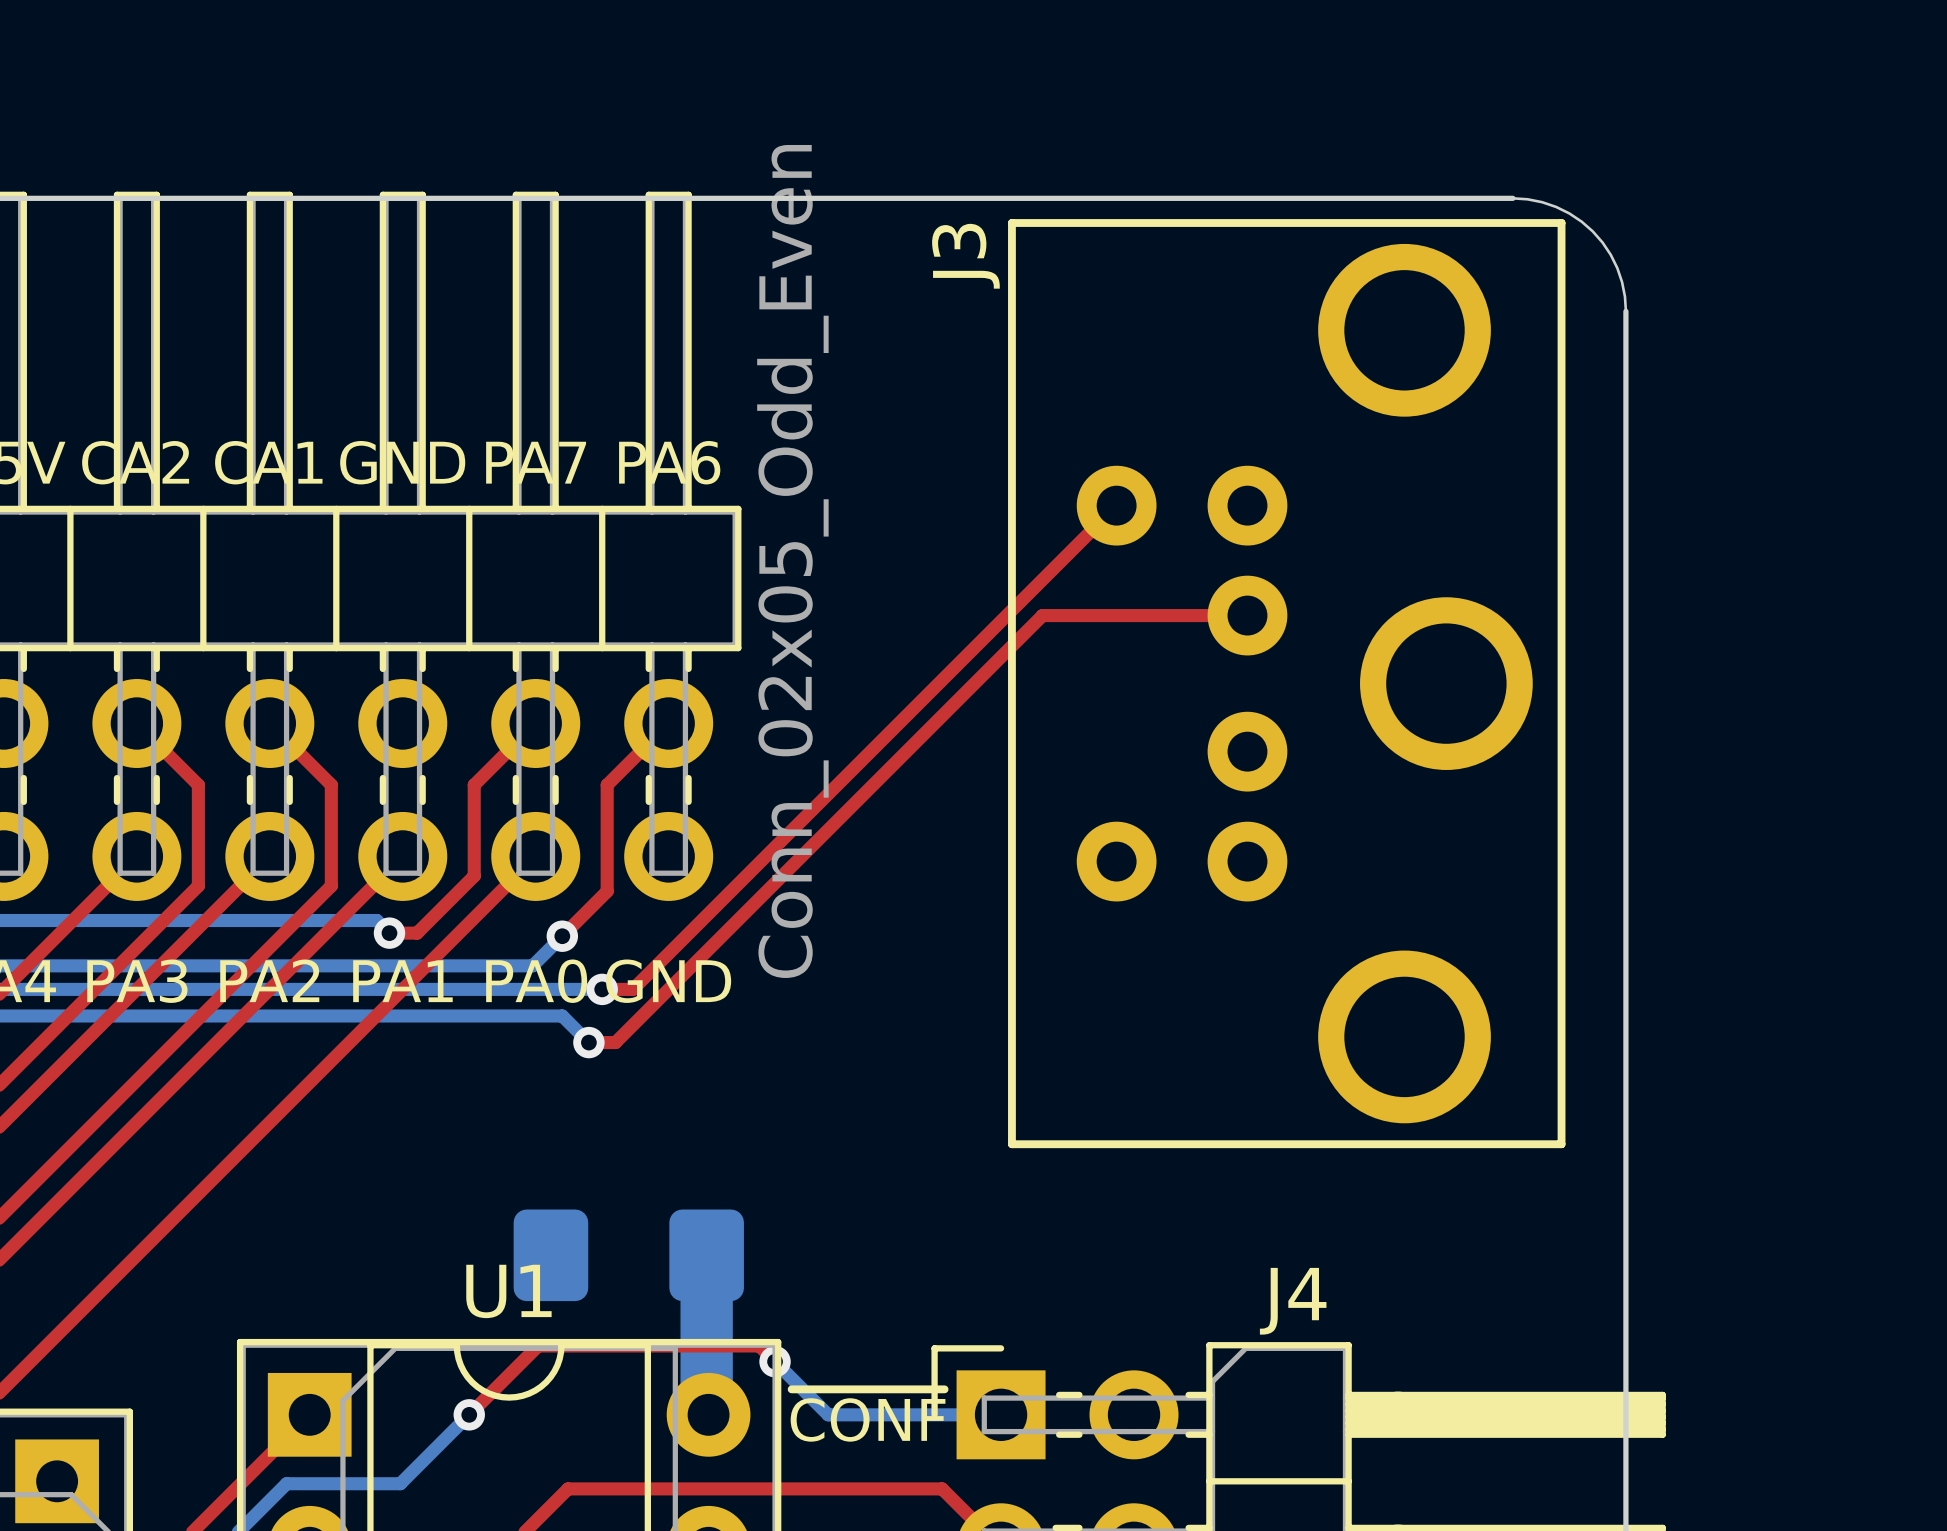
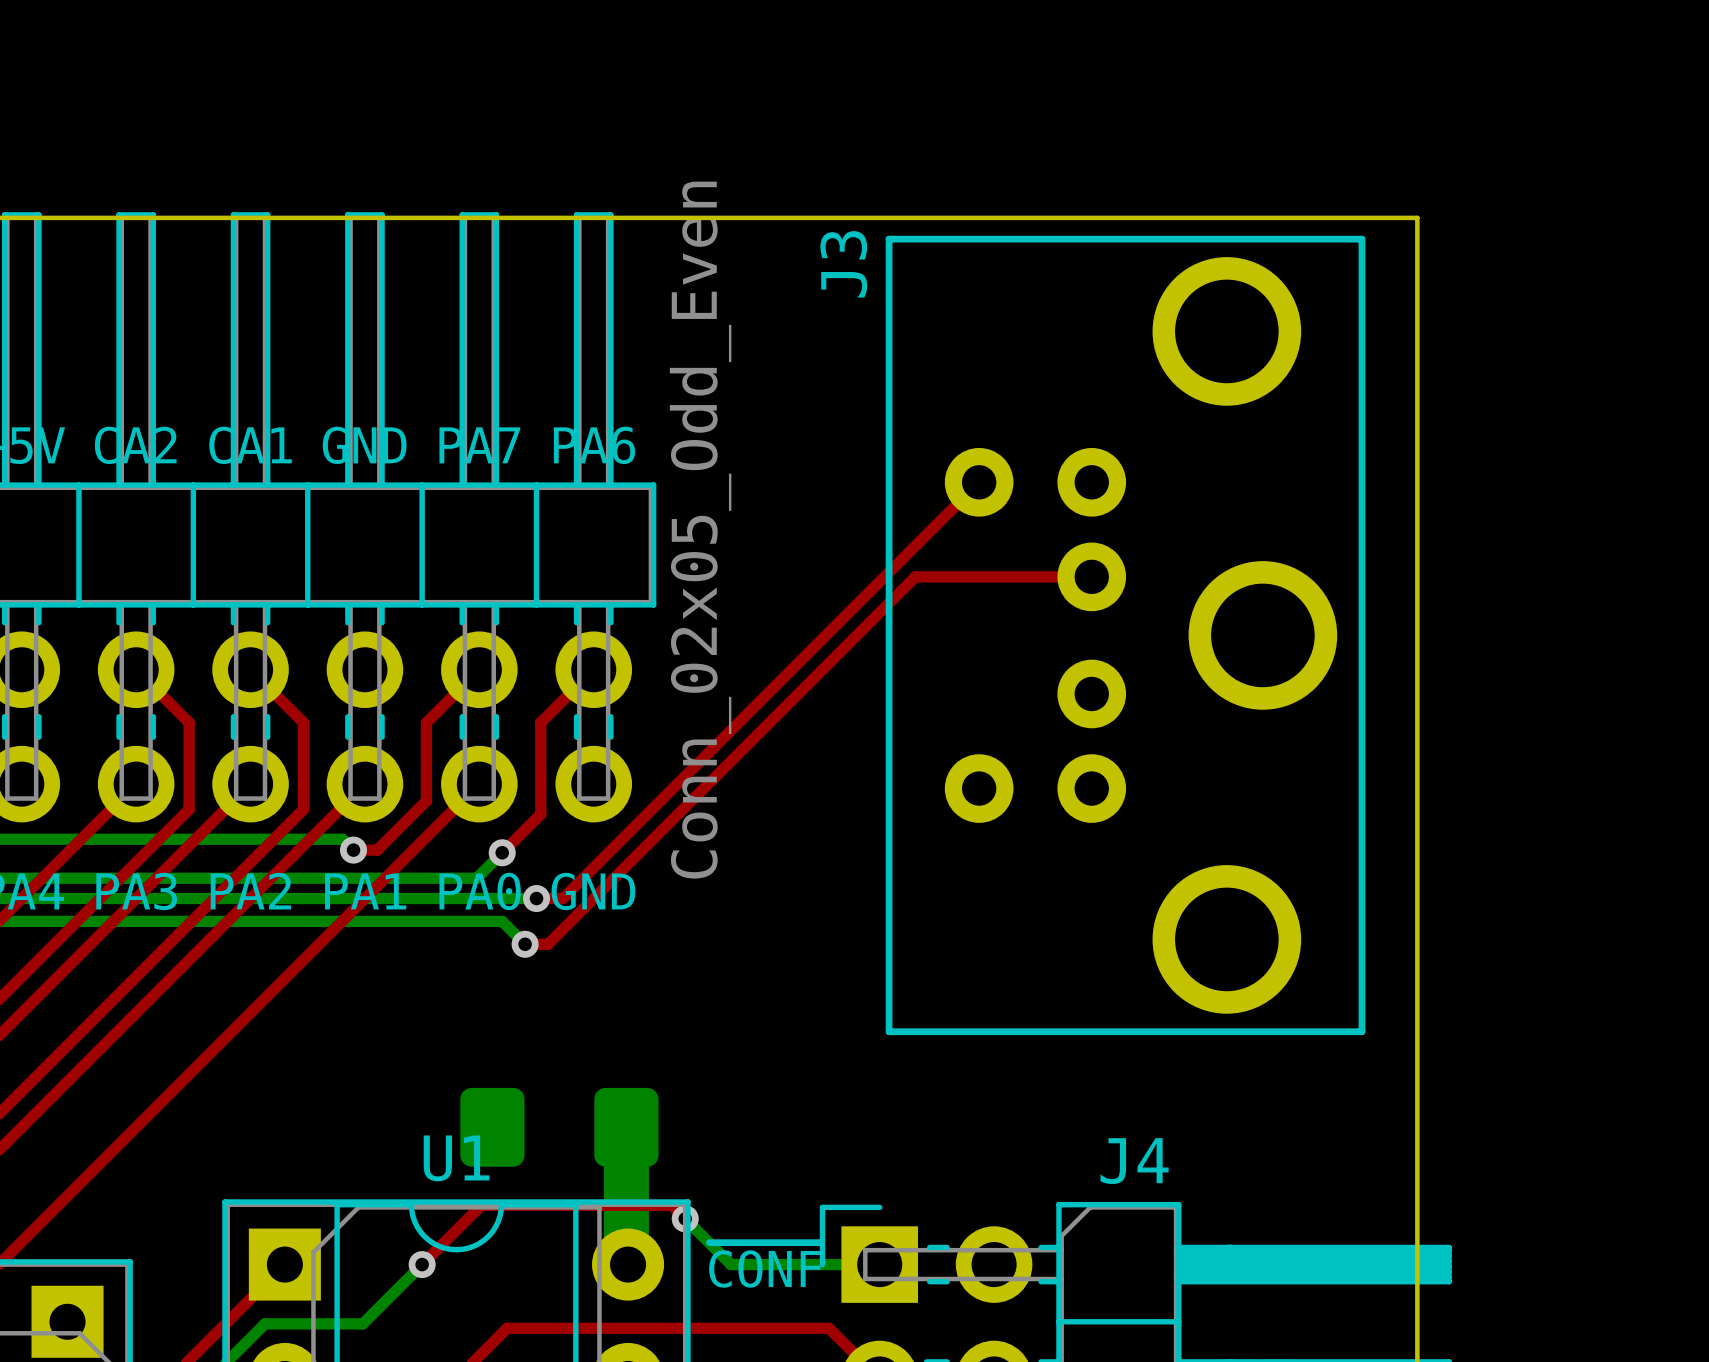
board edge: (1512, 198) (1527, 199) (1556, 206) (1581, 221) (1592, 231) (1602, 242) (1617, 268) (1624, 296) (1625, 311) -> (1320, 217) (1417, 217) (1417, 315)

